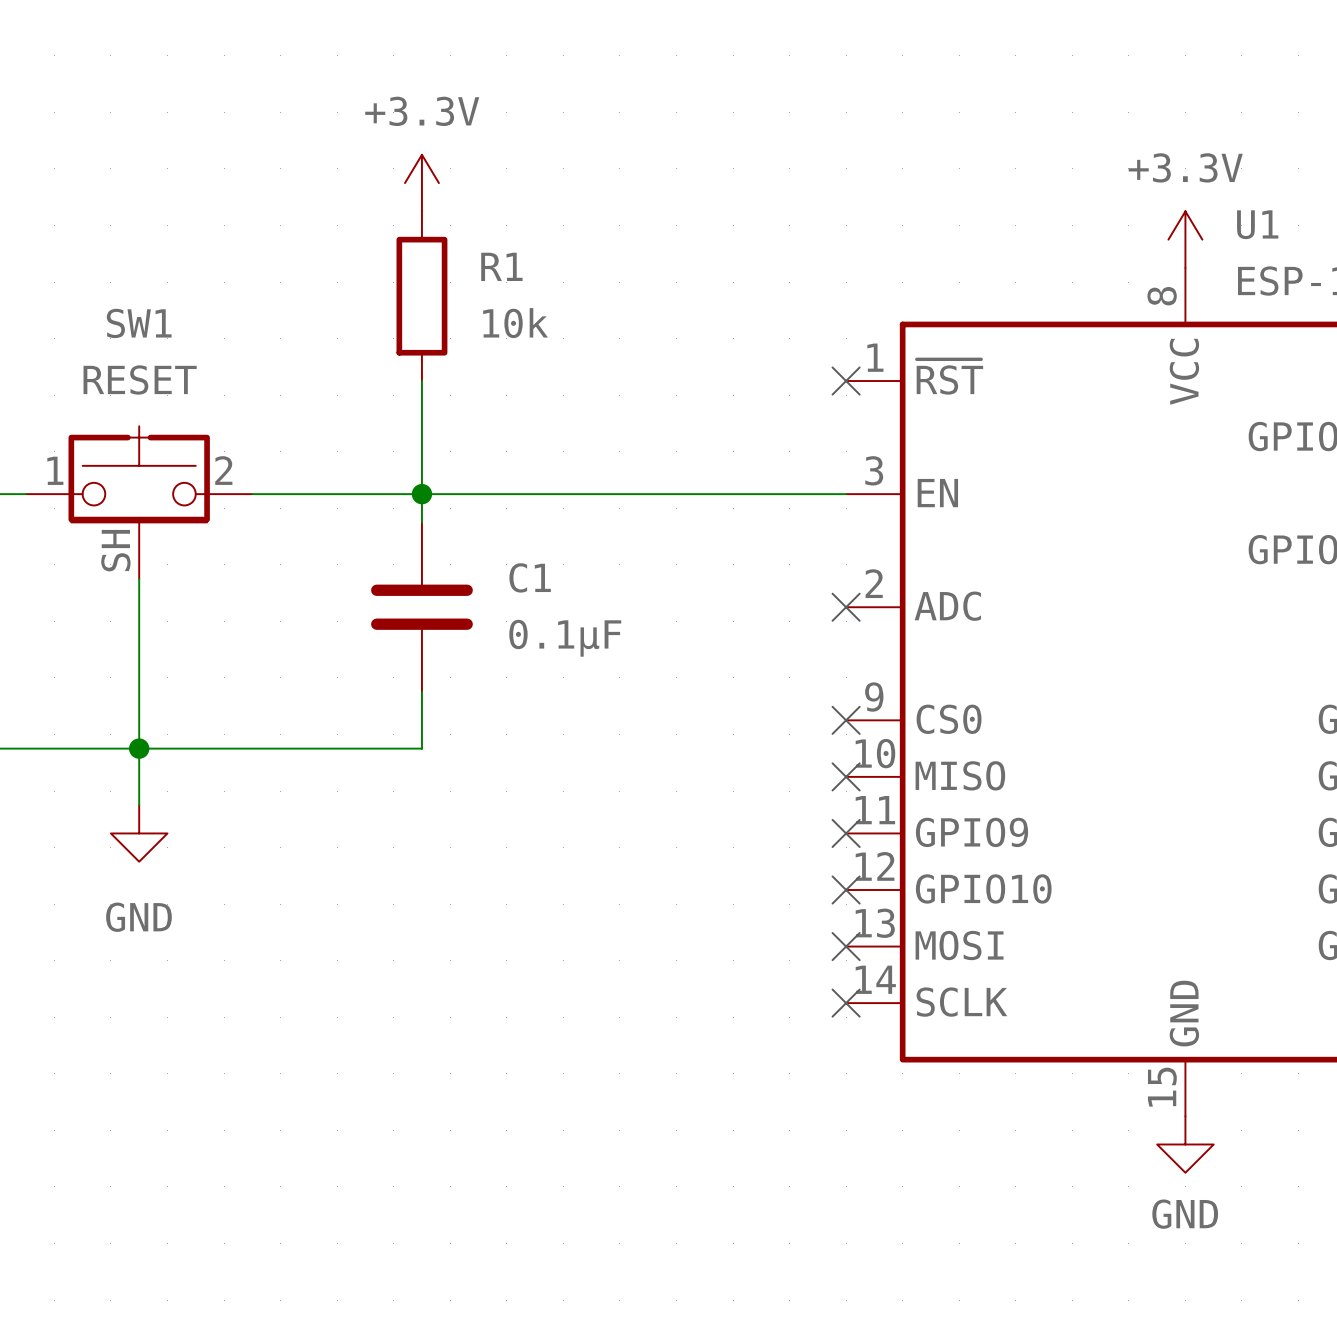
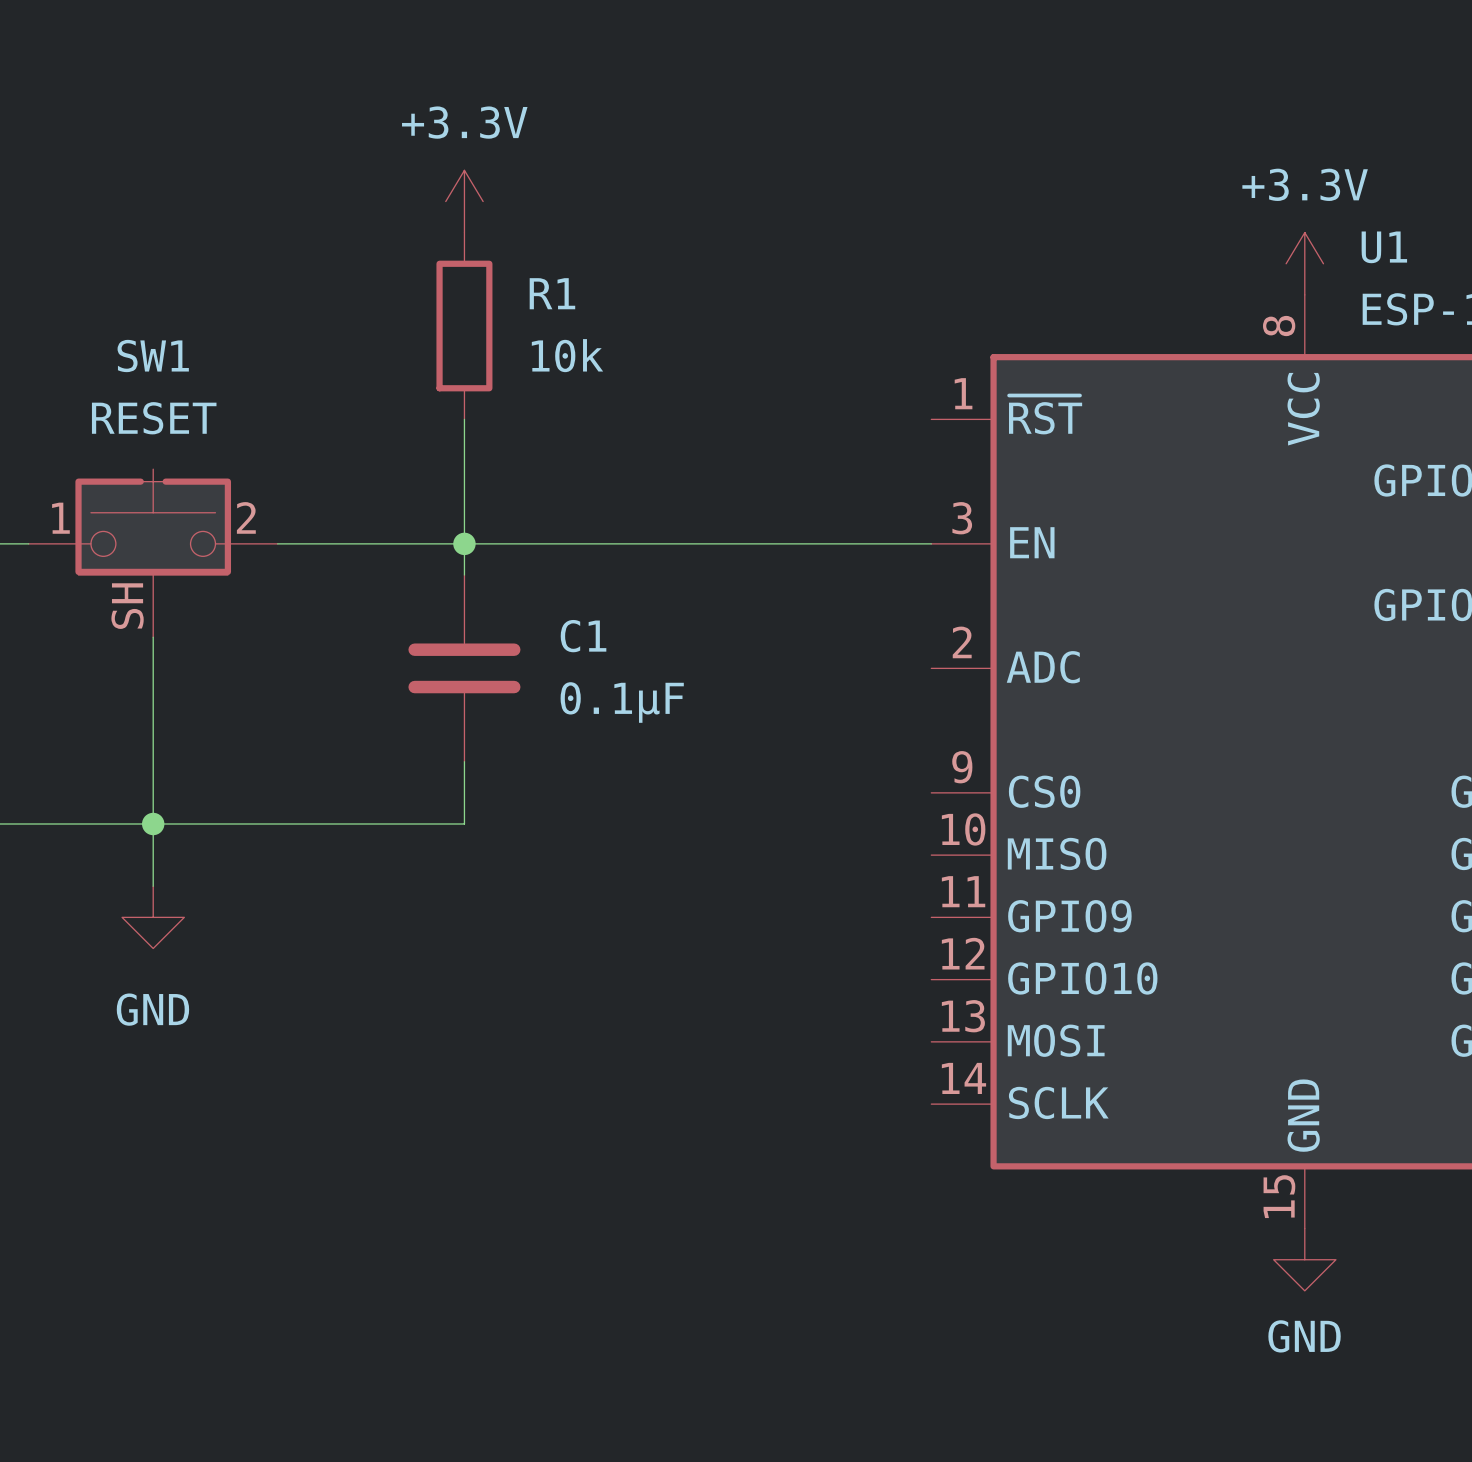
no-connect mark: (846, 381) -> none
no-connect mark: (846, 607) -> none
no-connect mark: (846, 720) -> none
no-connect mark: (846, 776) -> none
no-connect mark: (846, 833) -> none
no-connect mark: (846, 890) -> none
no-connect mark: (846, 946) -> none
no-connect mark: (846, 1003) -> none

